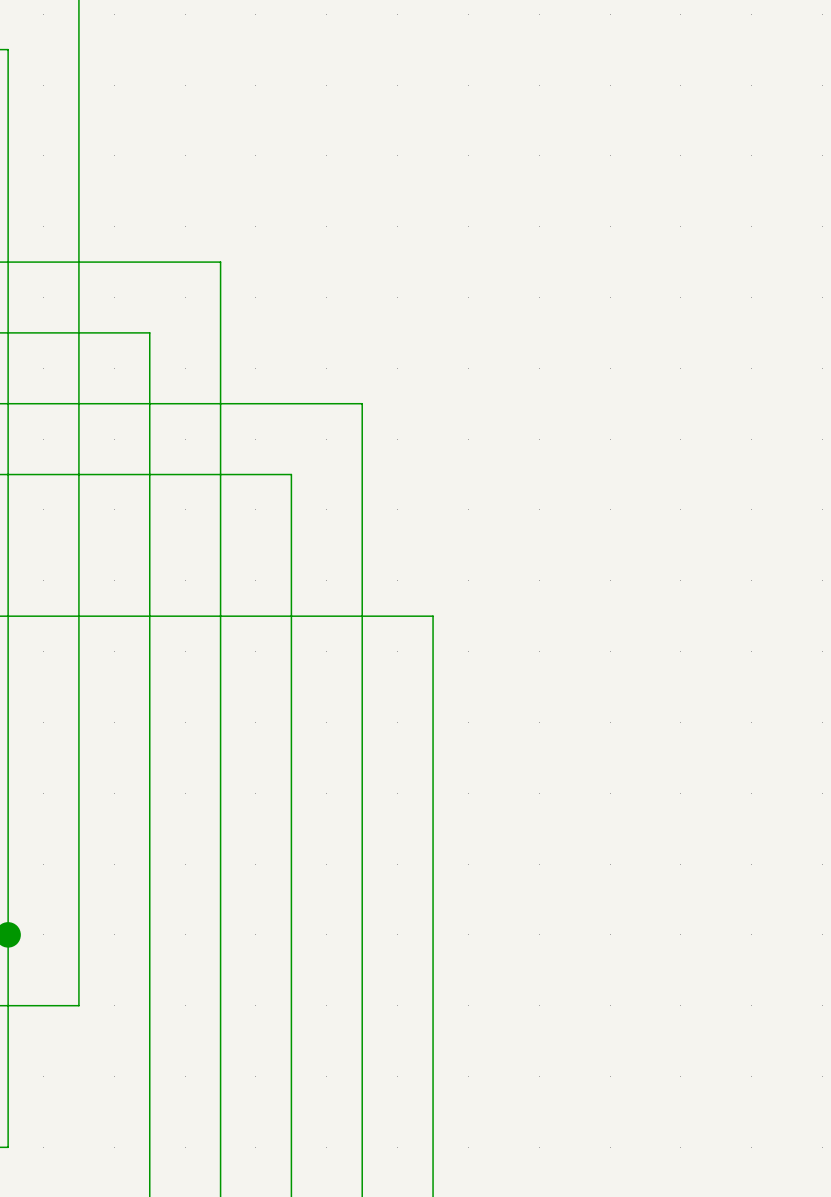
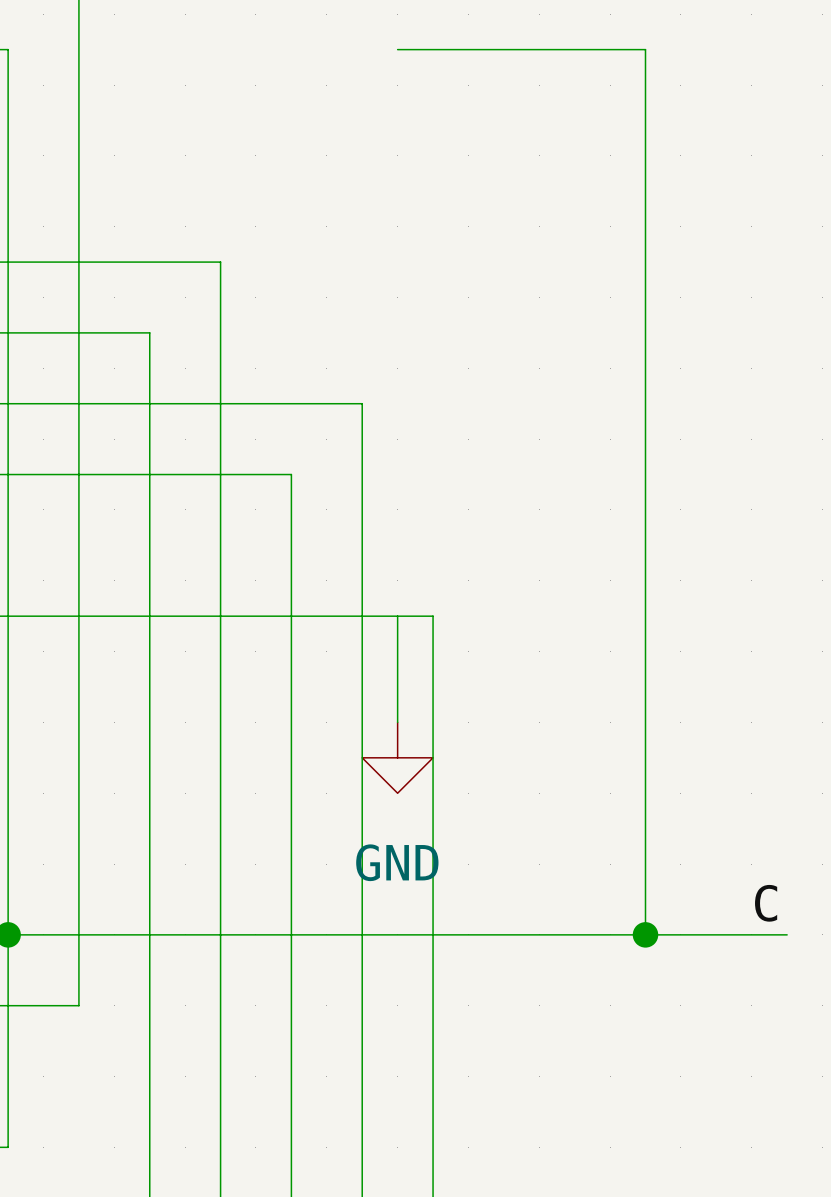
wire: none -> (397, 49) (645, 49) (645, 934)
wire: none -> (397, 616) (397, 722)
power symbol: none -> GND (397, 757)
label: none -> C (766, 903)
wire: none -> (8, 934) (787, 934)
junction: none -> (645, 934)

